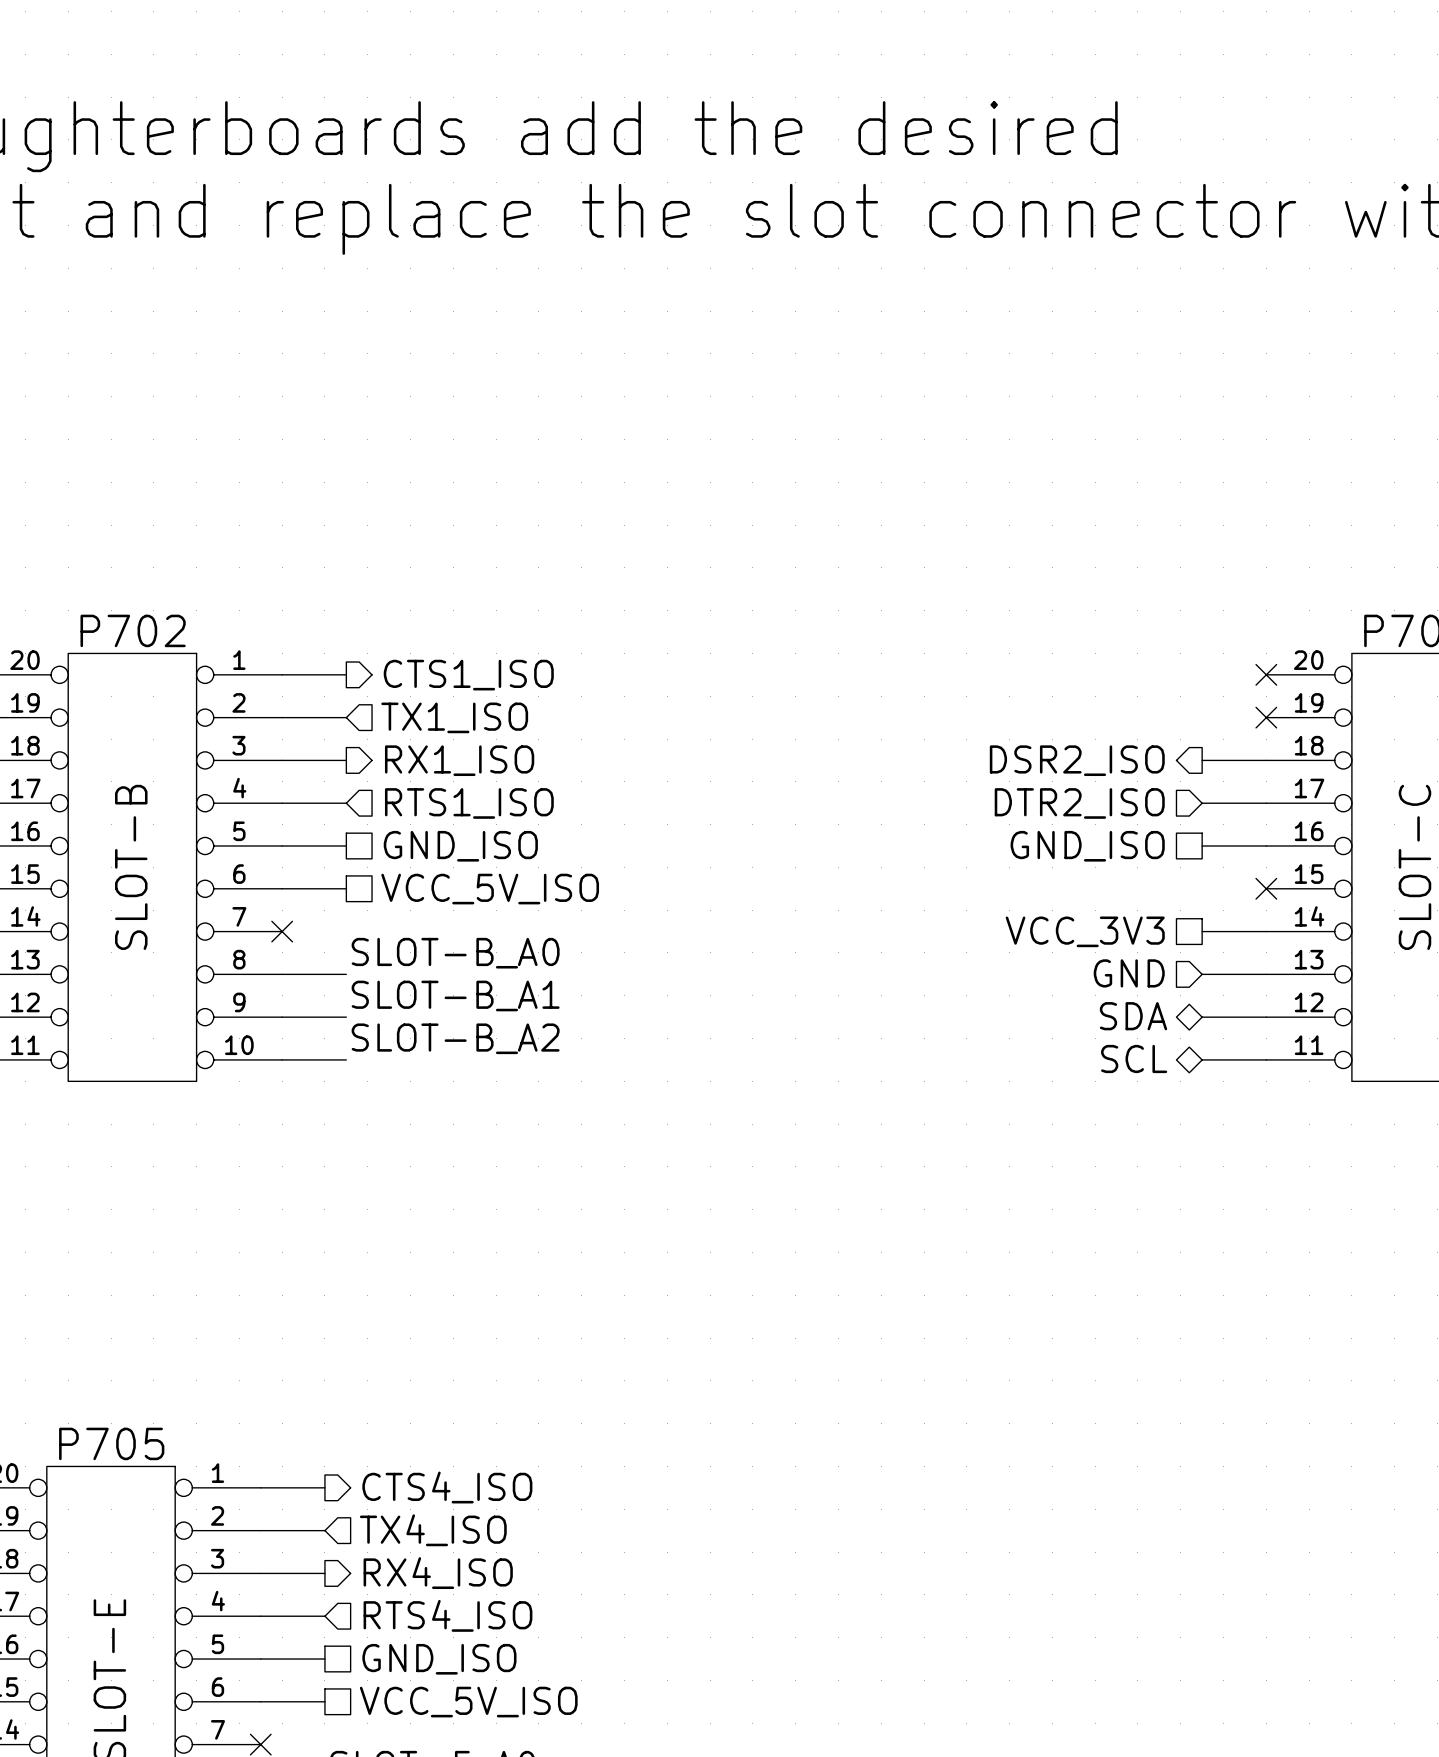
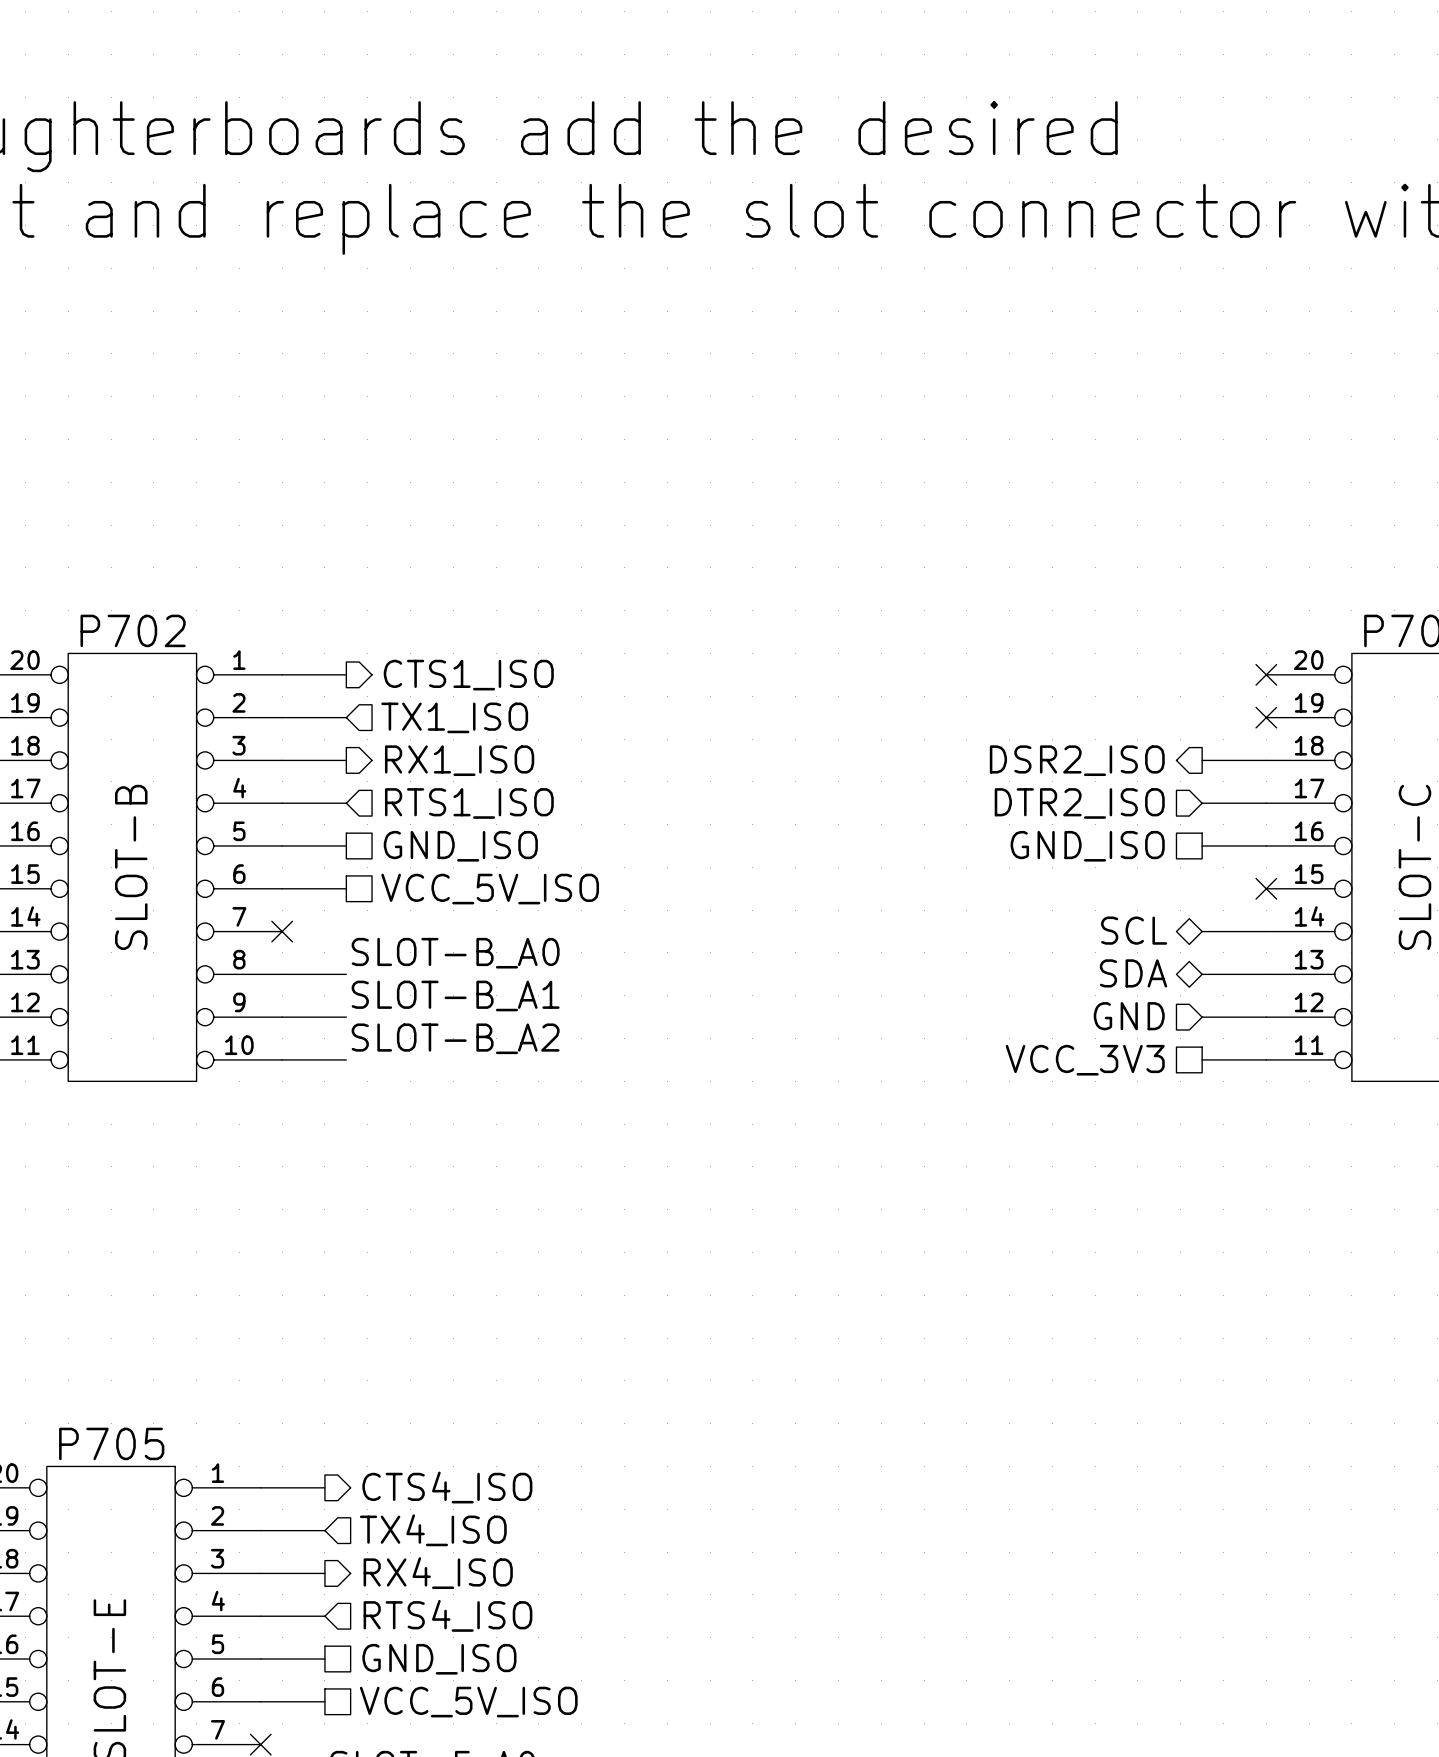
hierarchical label shape: passive (1085, 931) -> bidirectional (1134, 930)
hierarchical label: VCC_3V3 (1085, 931) -> SCL (1134, 930)
hierarchical label shape: input (1129, 973) -> bidirectional (1133, 973)
hierarchical label: GND (1129, 973) -> SDA (1133, 973)
hierarchical label shape: bidirectional (1133, 1016) -> input (1129, 1016)
hierarchical label: SDA (1133, 1016) -> GND (1129, 1016)
hierarchical label shape: bidirectional (1134, 1058) -> passive (1085, 1060)
hierarchical label: SCL (1134, 1058) -> VCC_3V3 (1085, 1060)

